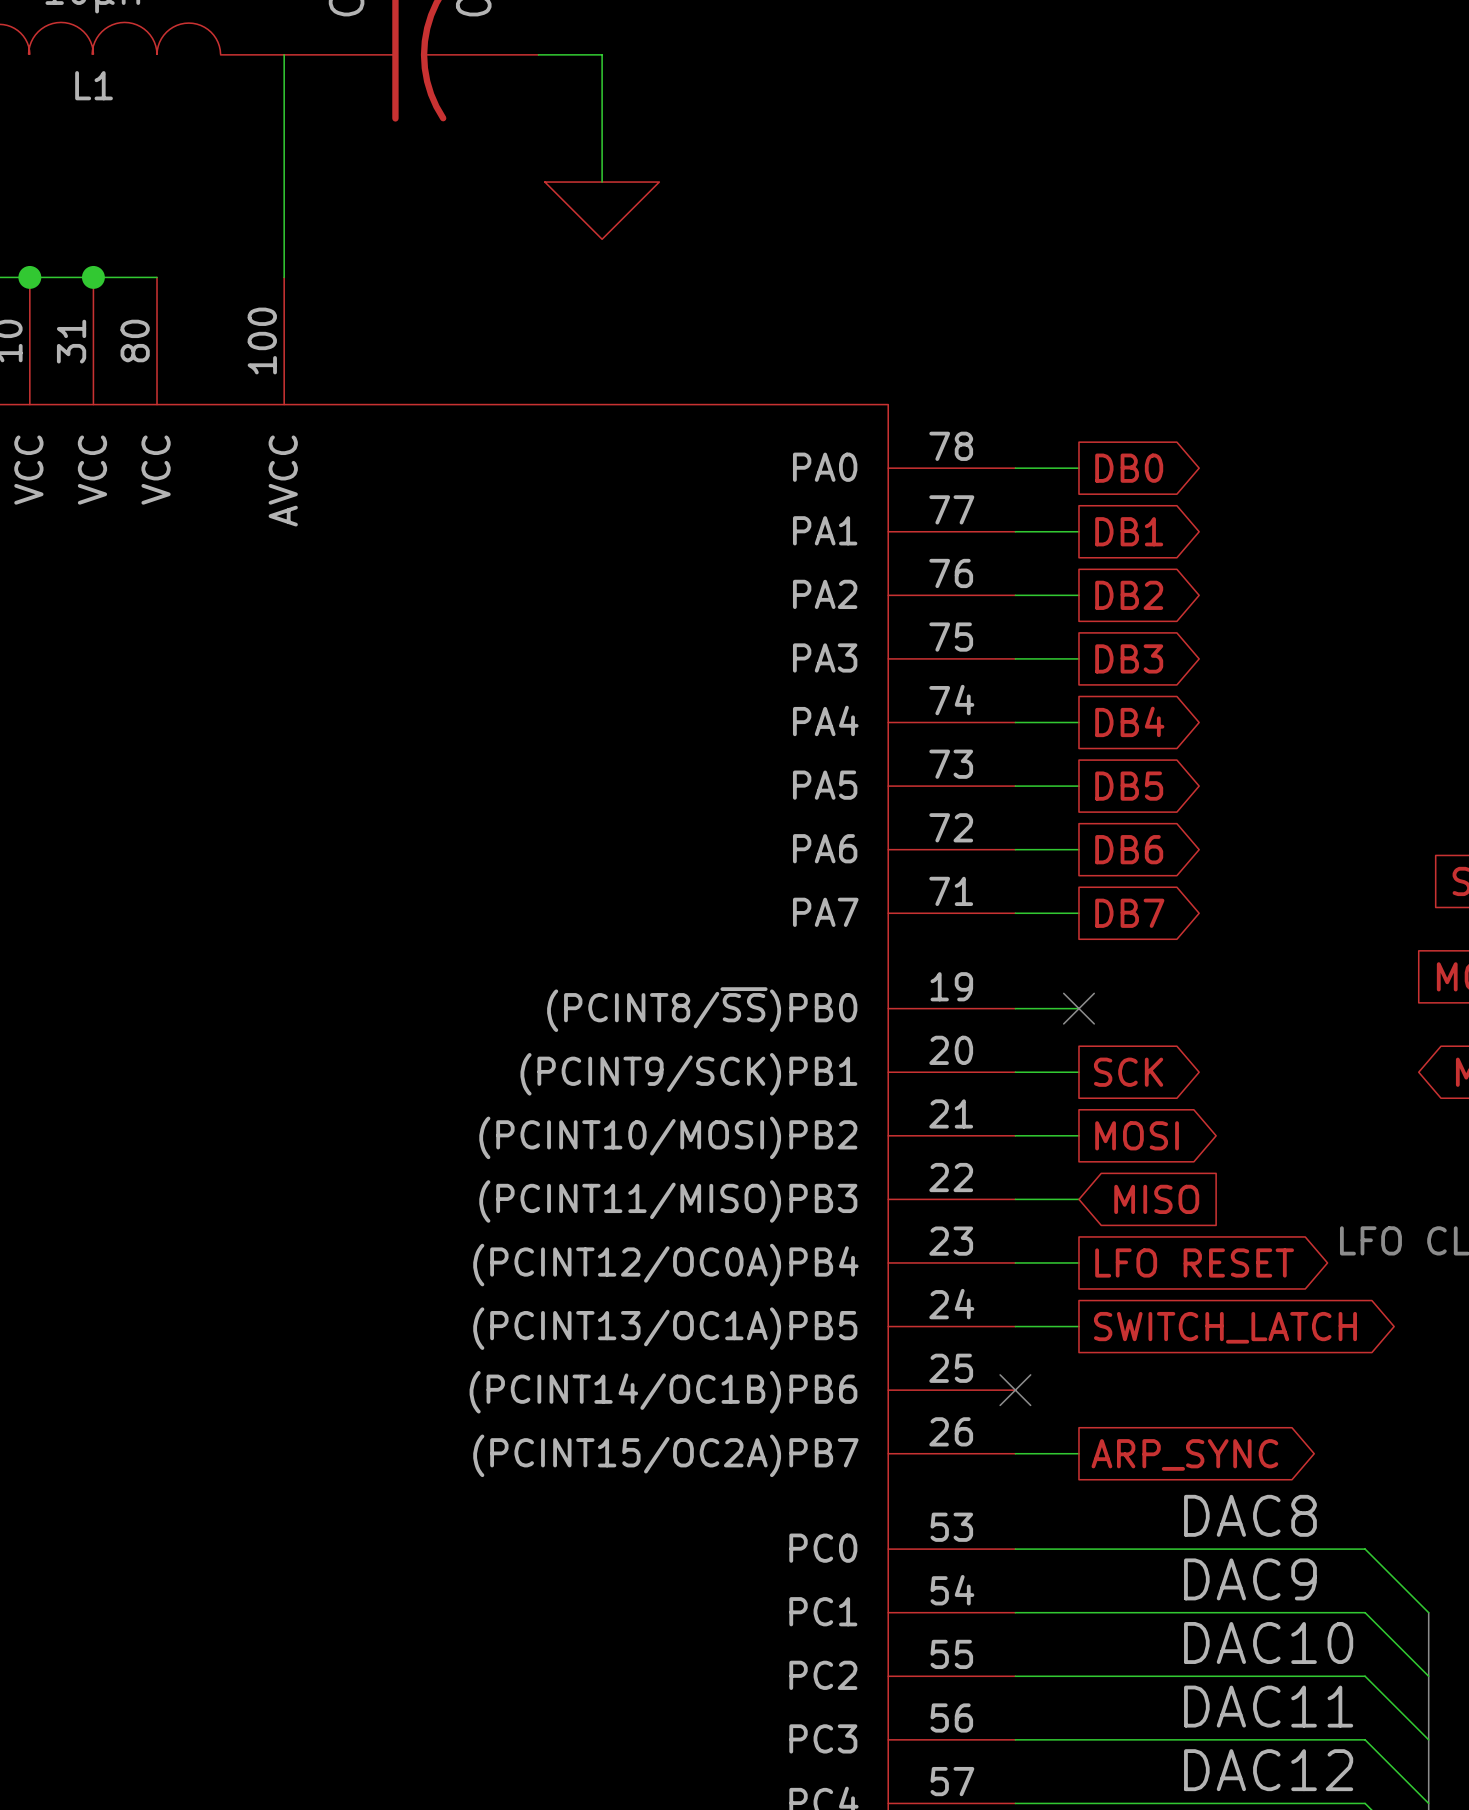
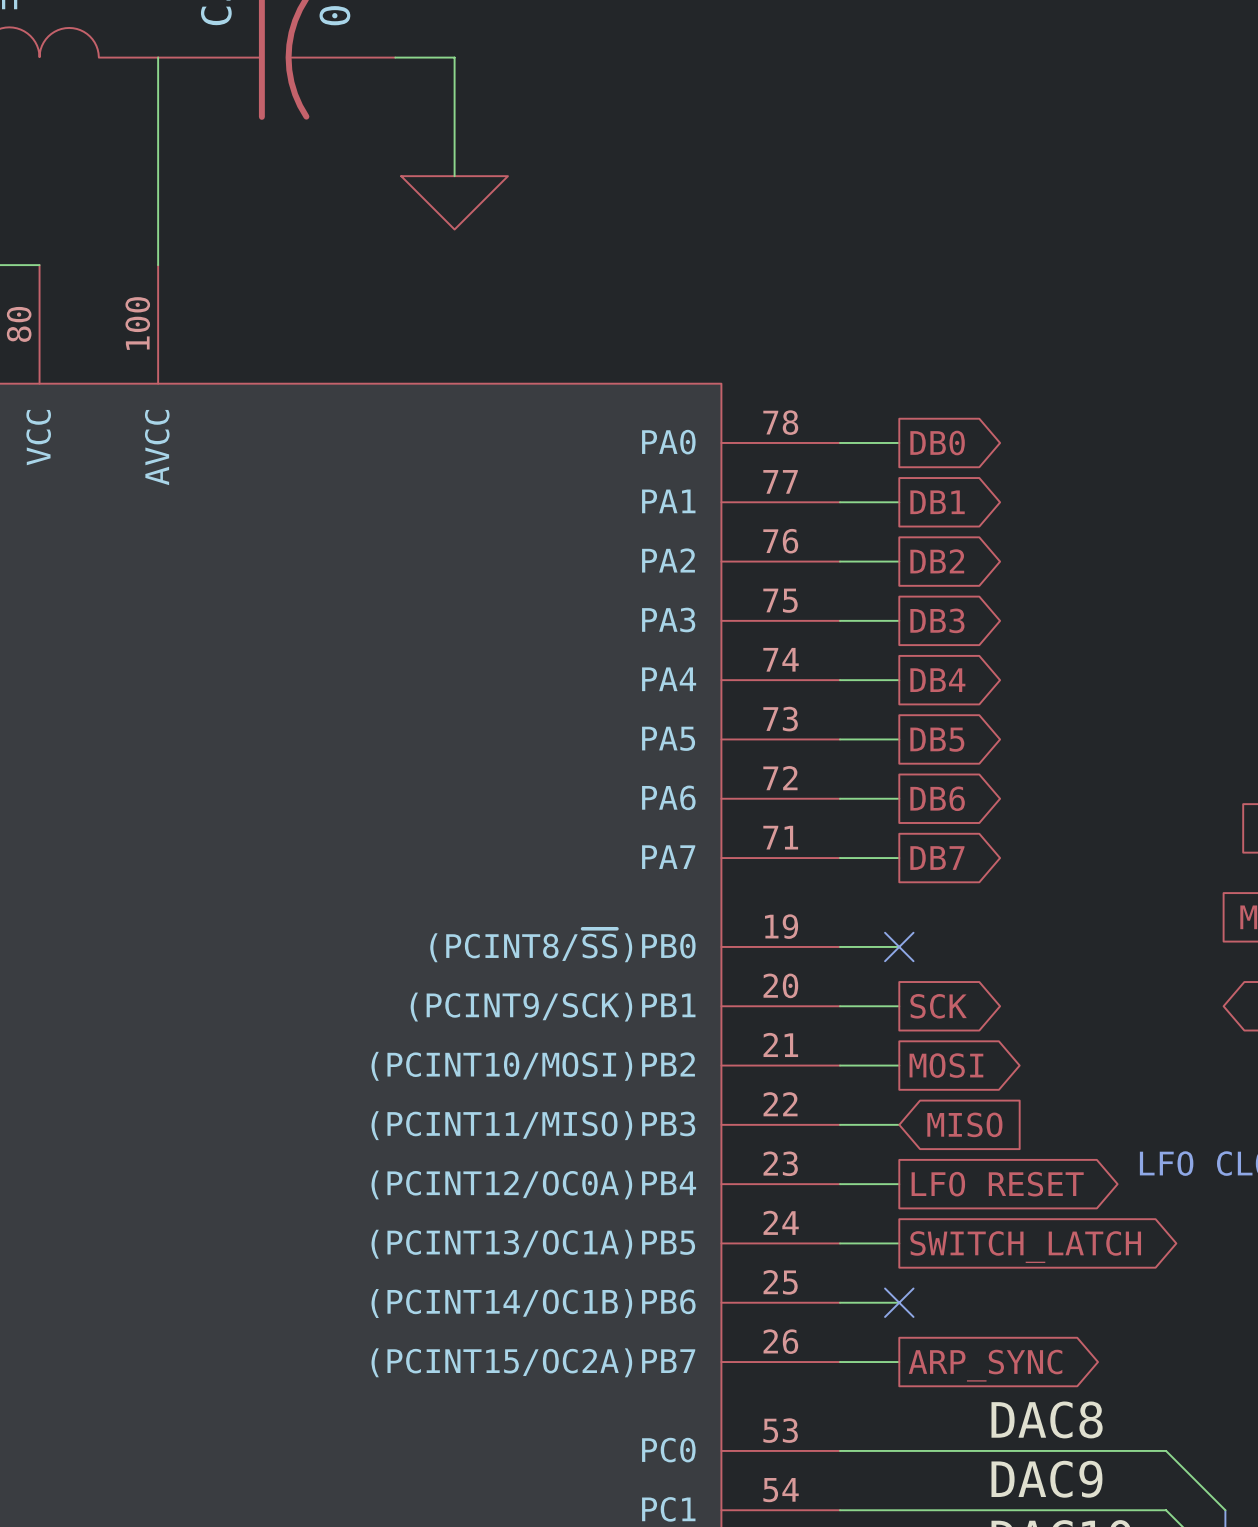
wire: none -> (839, 1302) (899, 1302)
no-connect mark position: (1015, 1390) -> (899, 1302)

